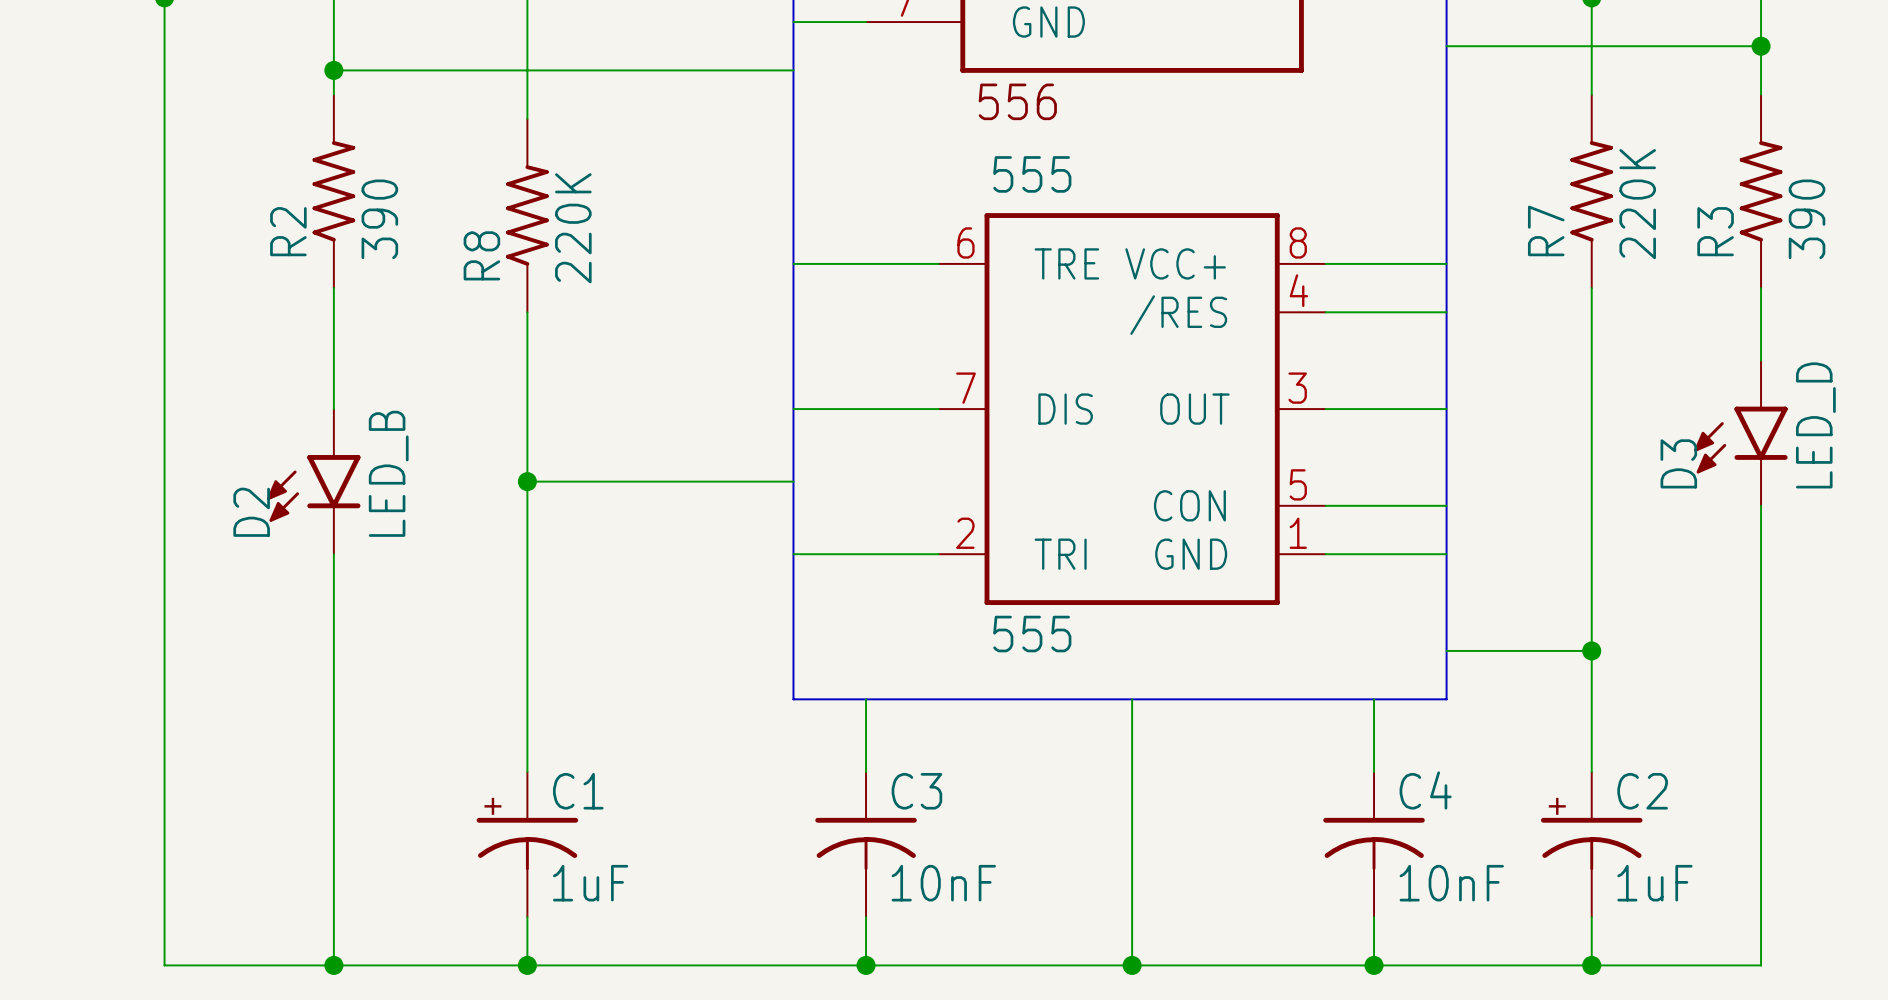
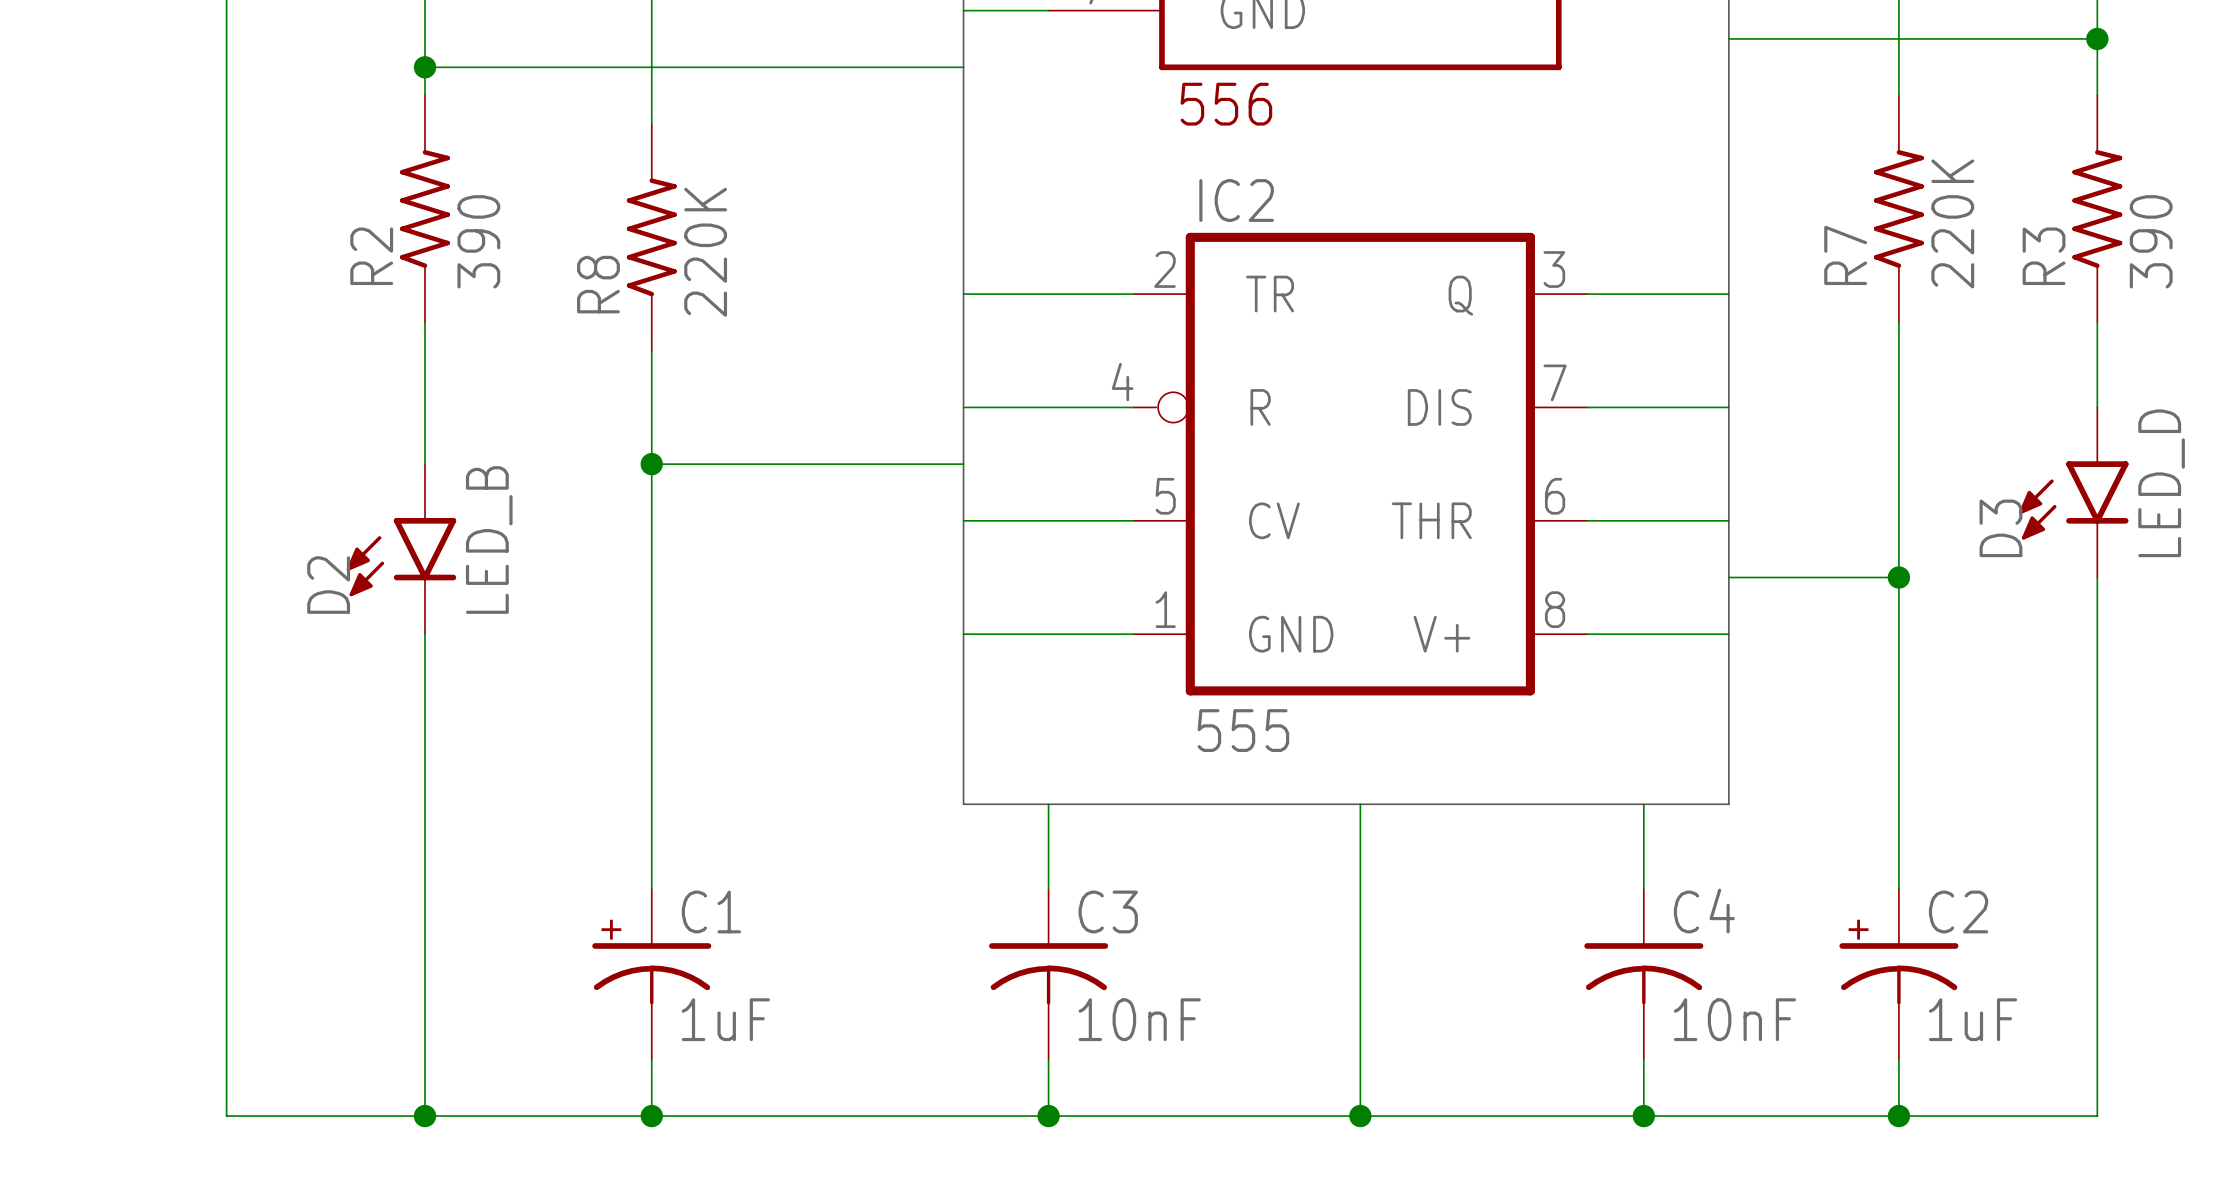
wire: (1325, 312) (1446, 312) -> (1587, 520) (1728, 520)
wire: none -> (963, 407) (1133, 407)
wire: (793, 409) (938, 409) -> (963, 464) (651, 464)
555: 555 (1132, 409) -> none
IC2: none -> 555 (1360, 464)
wire: (1325, 409) (1446, 409) -> (1587, 407) (1728, 407)
wire: none -> (963, 520) (1133, 520)
wire: (527, 481) (793, 481) -> none
junction position: (527, 481) -> (651, 464)
wire: (1325, 505) (1446, 505) -> (1898, 577) (1728, 577)
junction: none -> (1898, 577)
wire: (1446, 650) (1591, 650) -> none
junction: (1591, 650) -> none

